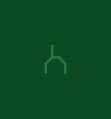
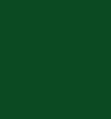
track: (52, 45) (52, 57) (45, 63) (45, 72) -> none
track: (52, 57) (58, 57) (65, 63) (65, 73) -> none

